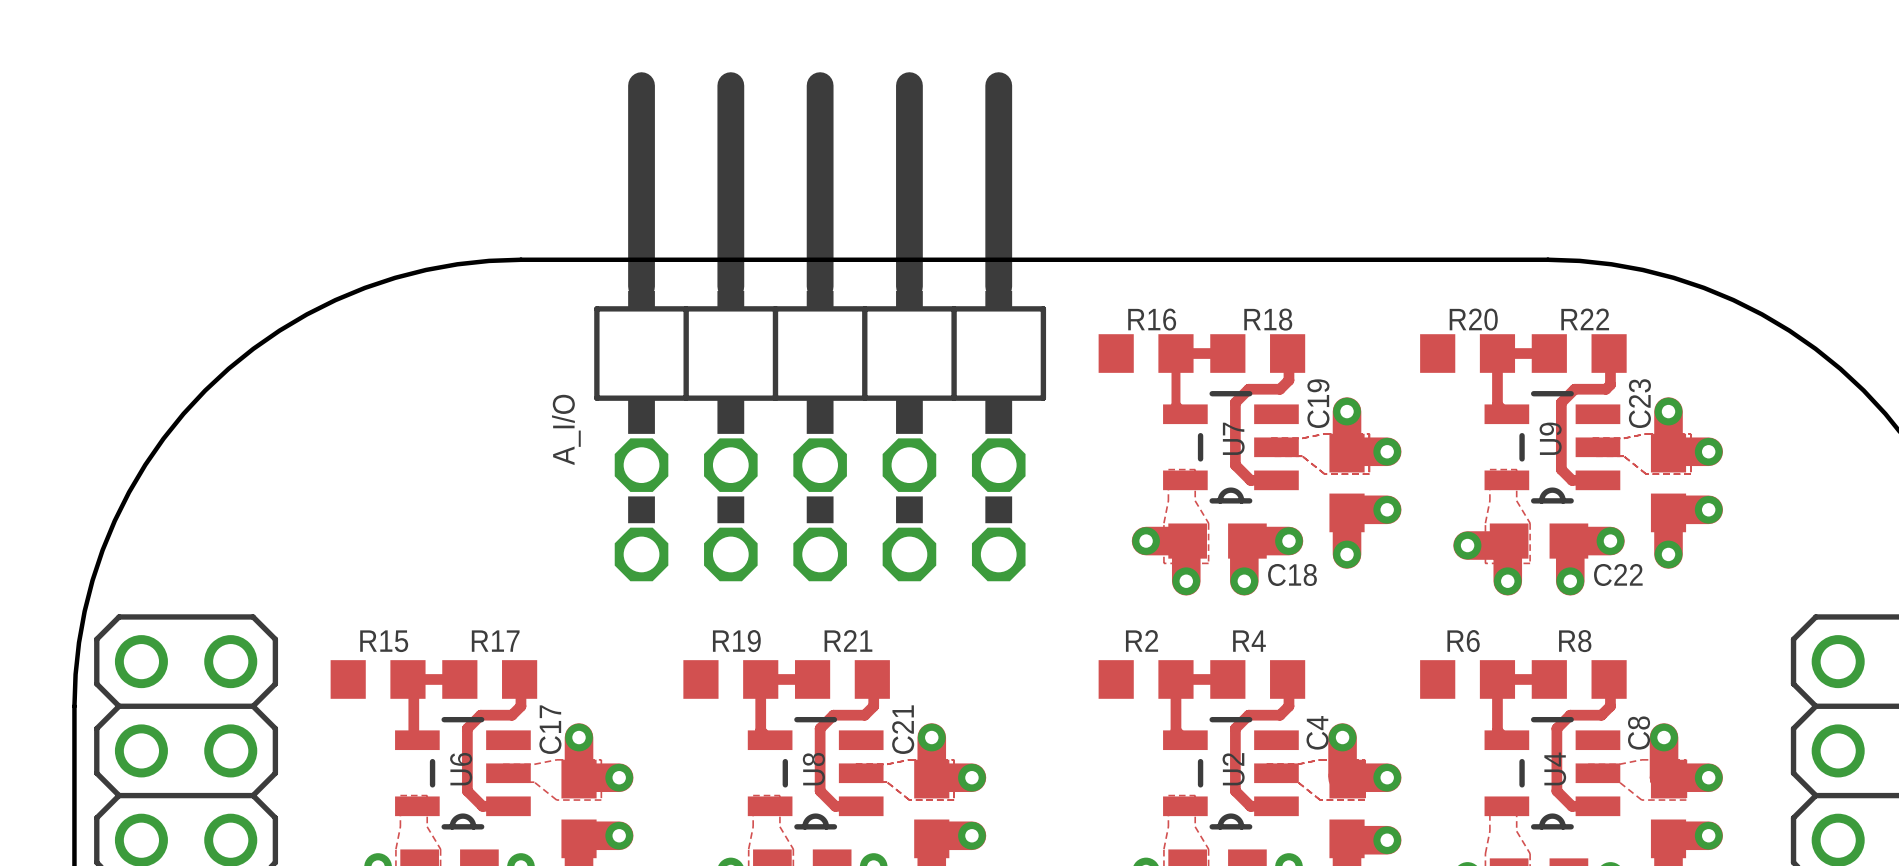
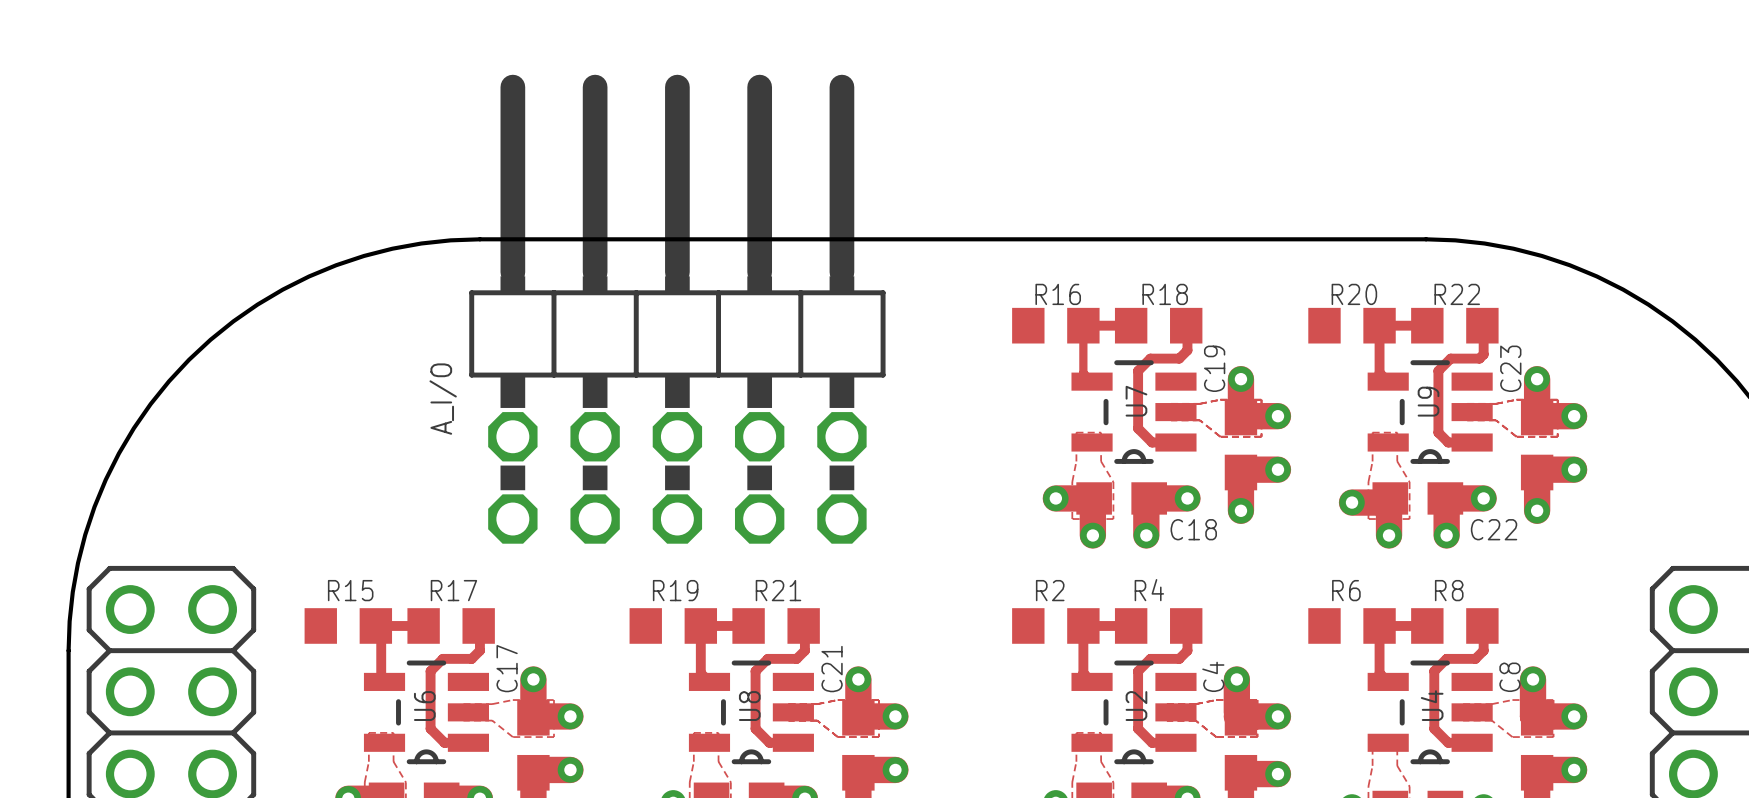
A_I/O position: (820, 326) -> (677, 309)

